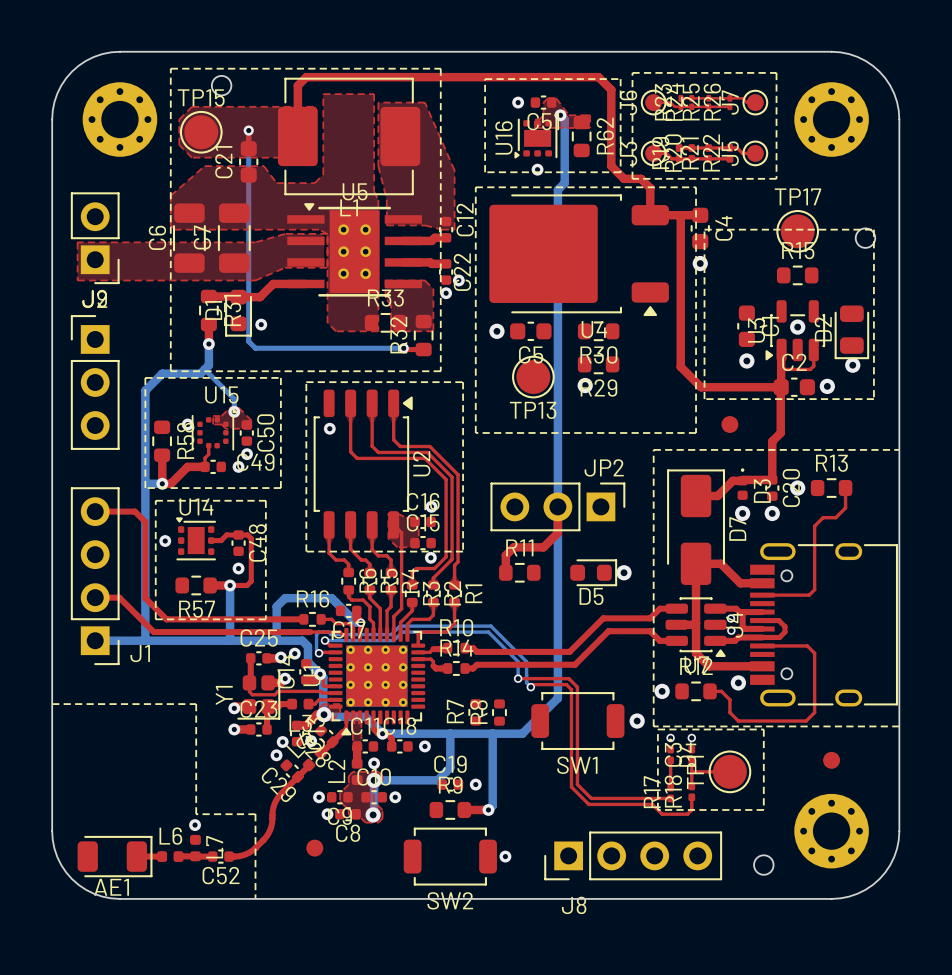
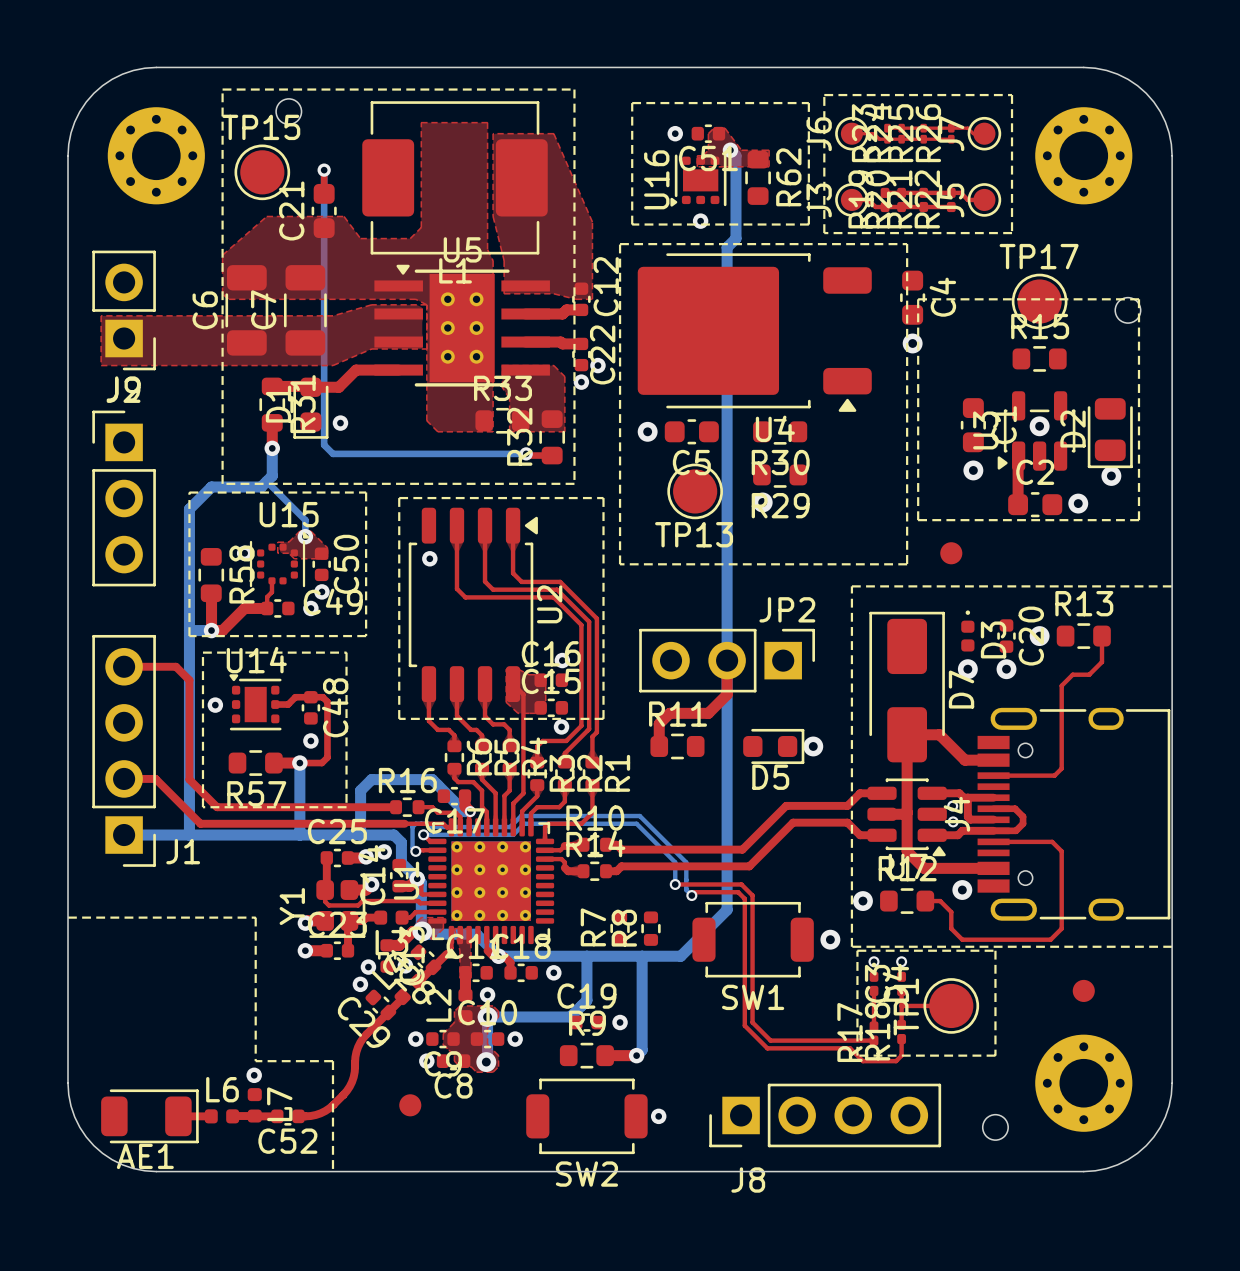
top zone outline: (191, 106) (179, 119) (179, 144) (191, 157) (314, 157) (314, 106) (191, 106) -> none
top track: (297, 136) (297, 85) (306, 77) (598, 77) (611, 89) (611, 166) (624, 178) (640, 178) (650, 188) (650, 215) (700, 215) -> none
top track: (680, 219) (680, 366) (701, 387) (781, 387) (780, 432) (772, 441) (772, 479) (732, 480) (717, 496) (696, 496) -> none
top track: (813, 349) (813, 366) (810, 369) (781, 369) -> none

